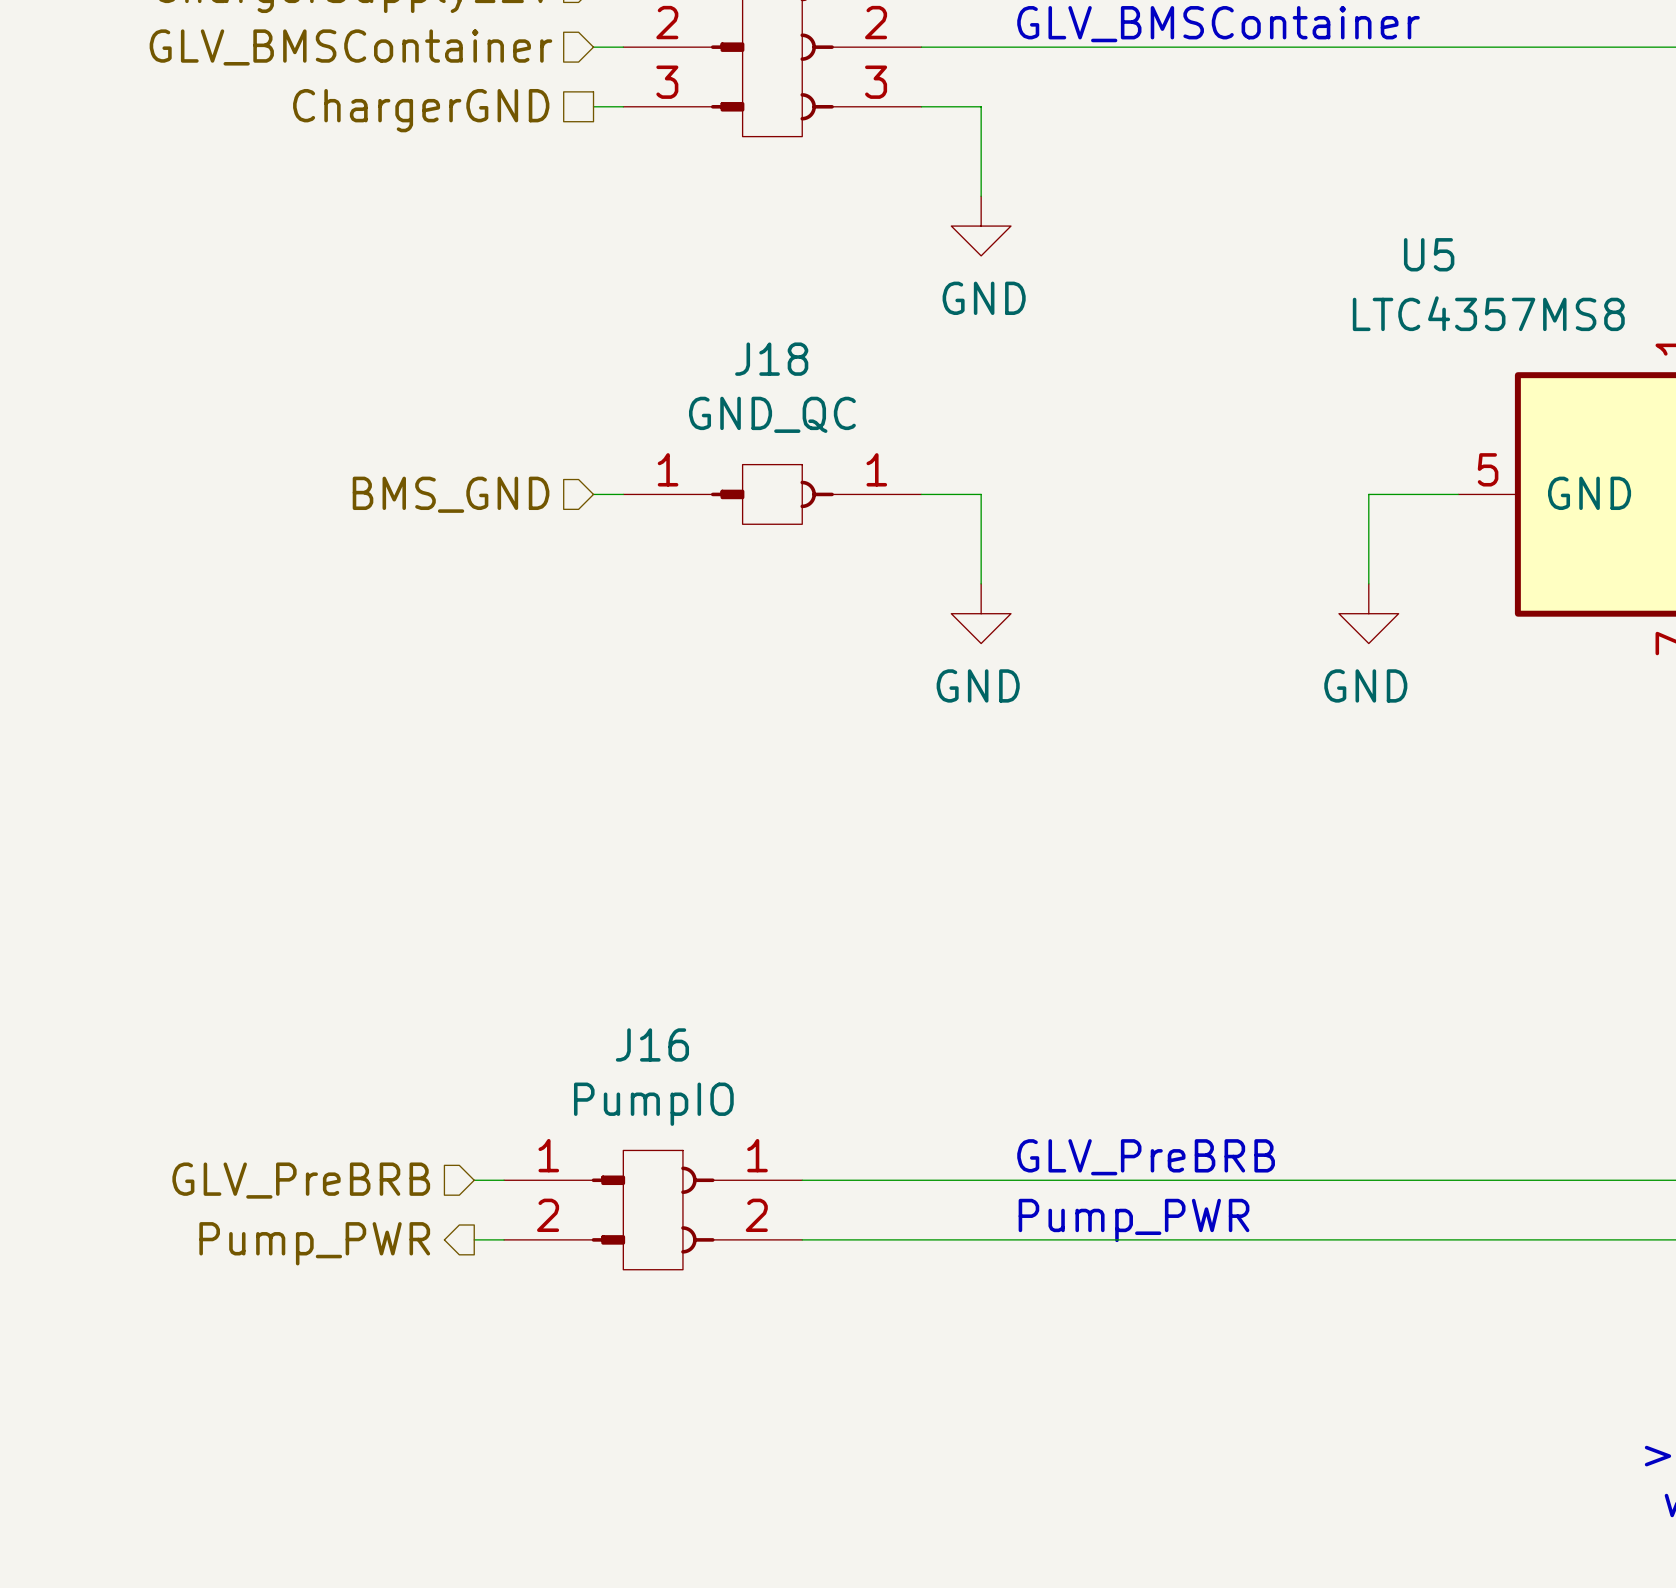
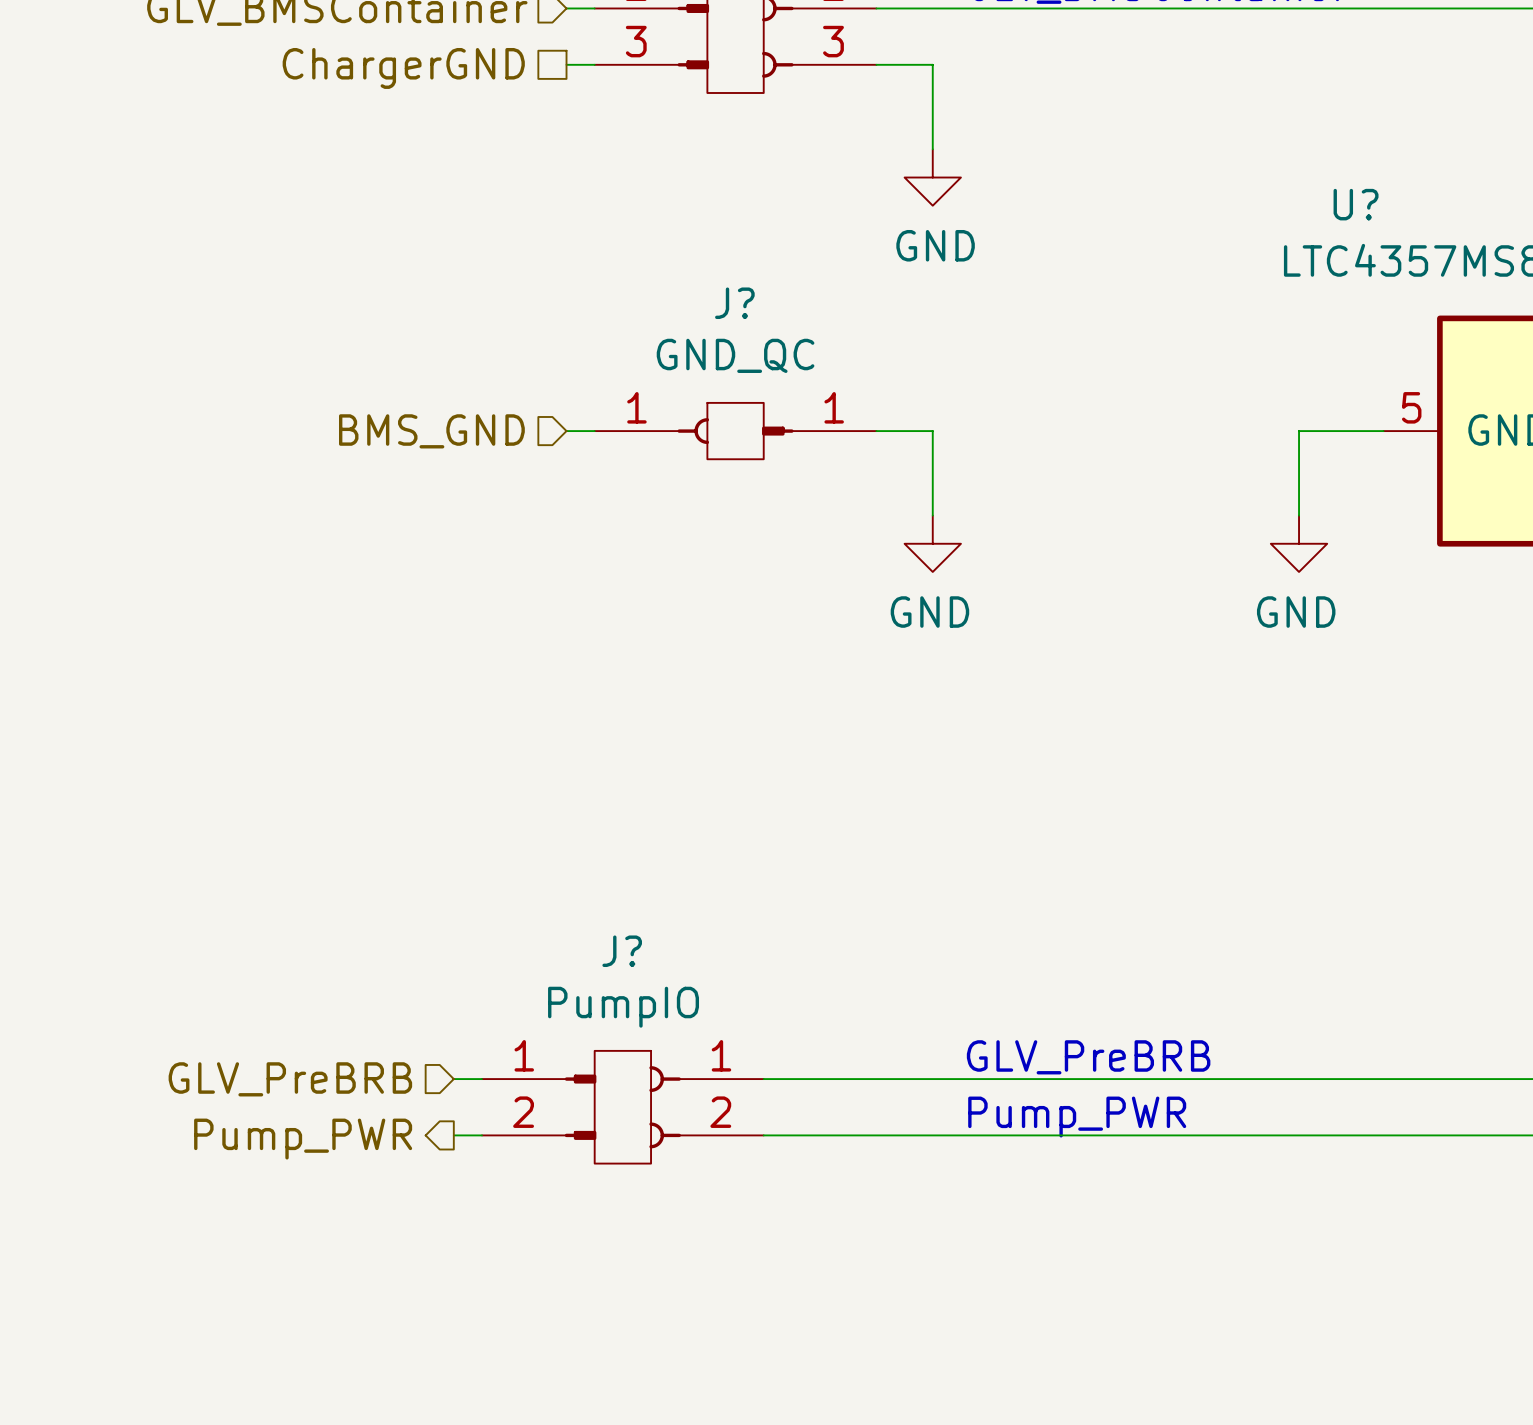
U5 name: U5 (1429, 254) -> U? (1356, 204)
J18: GND_QC (772, 494) -> none
J?: none -> GND_QC (735, 431)
J16 name: J16 (652, 1044) -> J? (622, 951)

